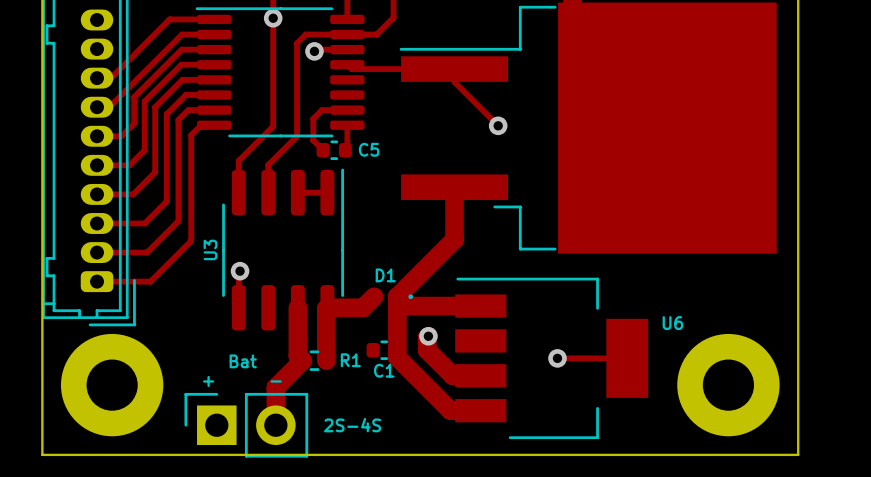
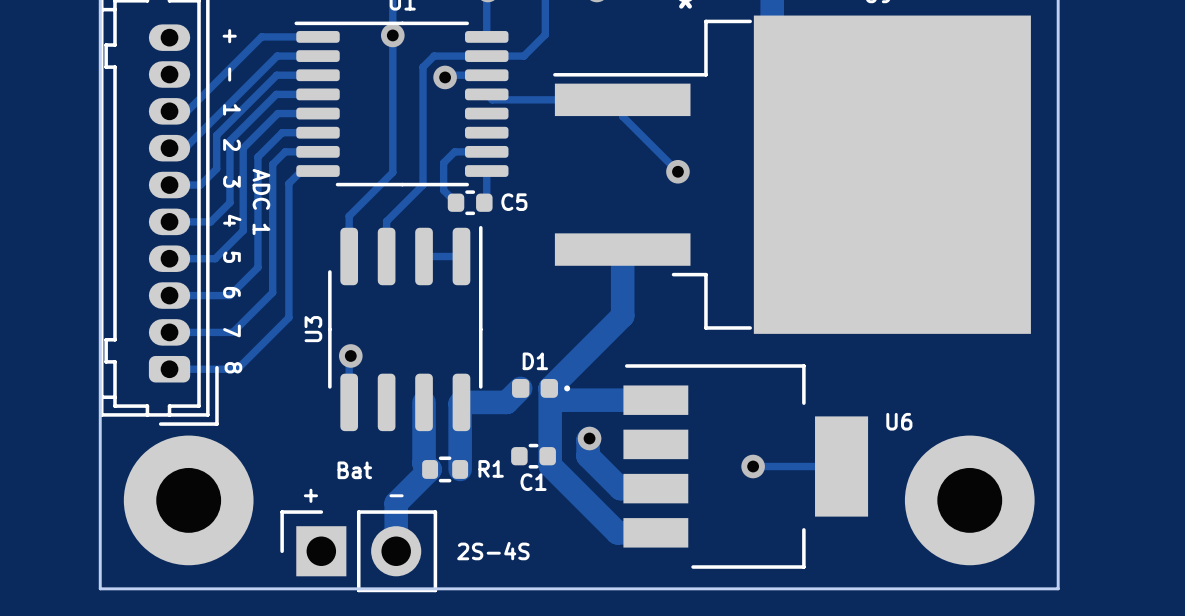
text: none -> + (229, 36)
text: none -> - (229, 74)
text: none -> 1 (231, 109)
text: none -> 2 (231, 144)
text: none -> 3 (231, 181)
text: none -> ADC 1 (261, 202)
text: none -> 4 (232, 220)
text: none -> 5 (231, 257)
text: none -> 6 (231, 292)
text: none -> 7 (231, 330)
text: none -> 8 (233, 367)

